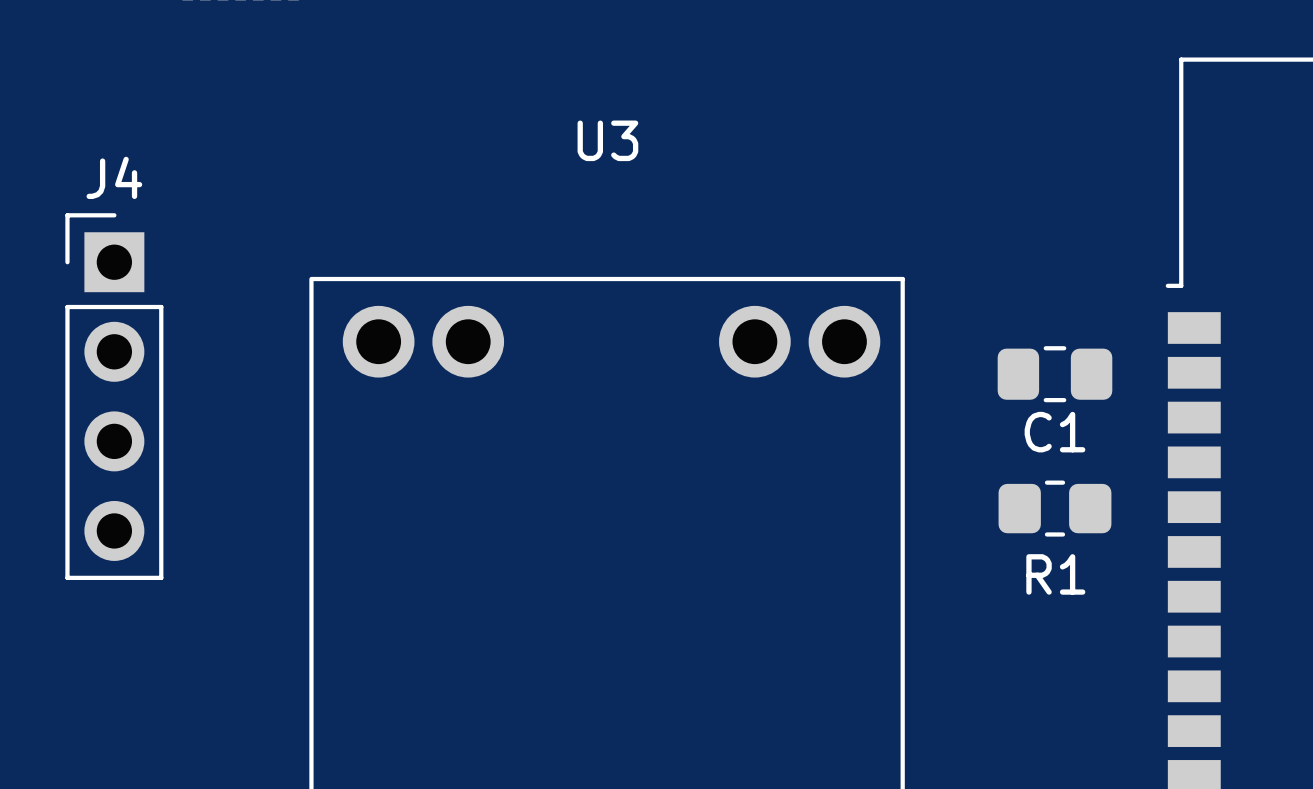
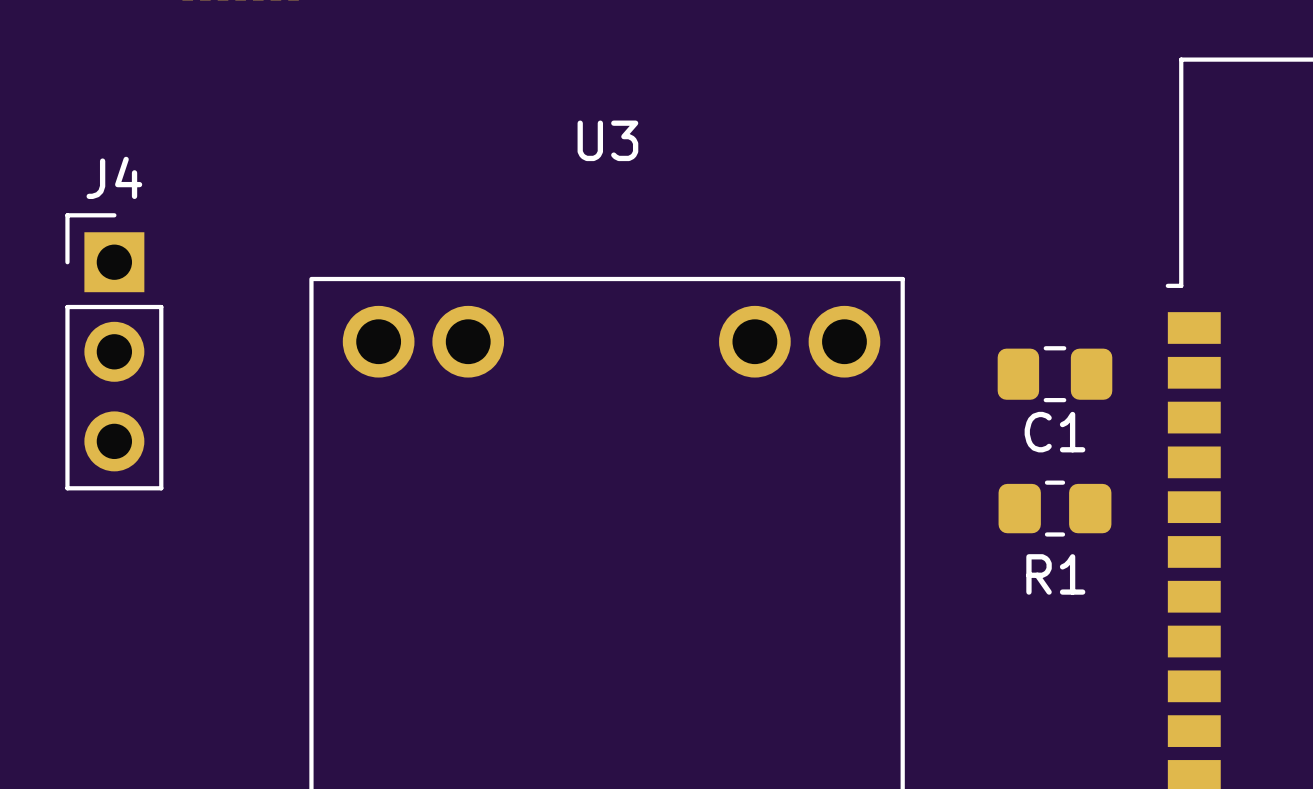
J4 footprint: [65, 213, 164, 580] -> [65, 213, 164, 491]

